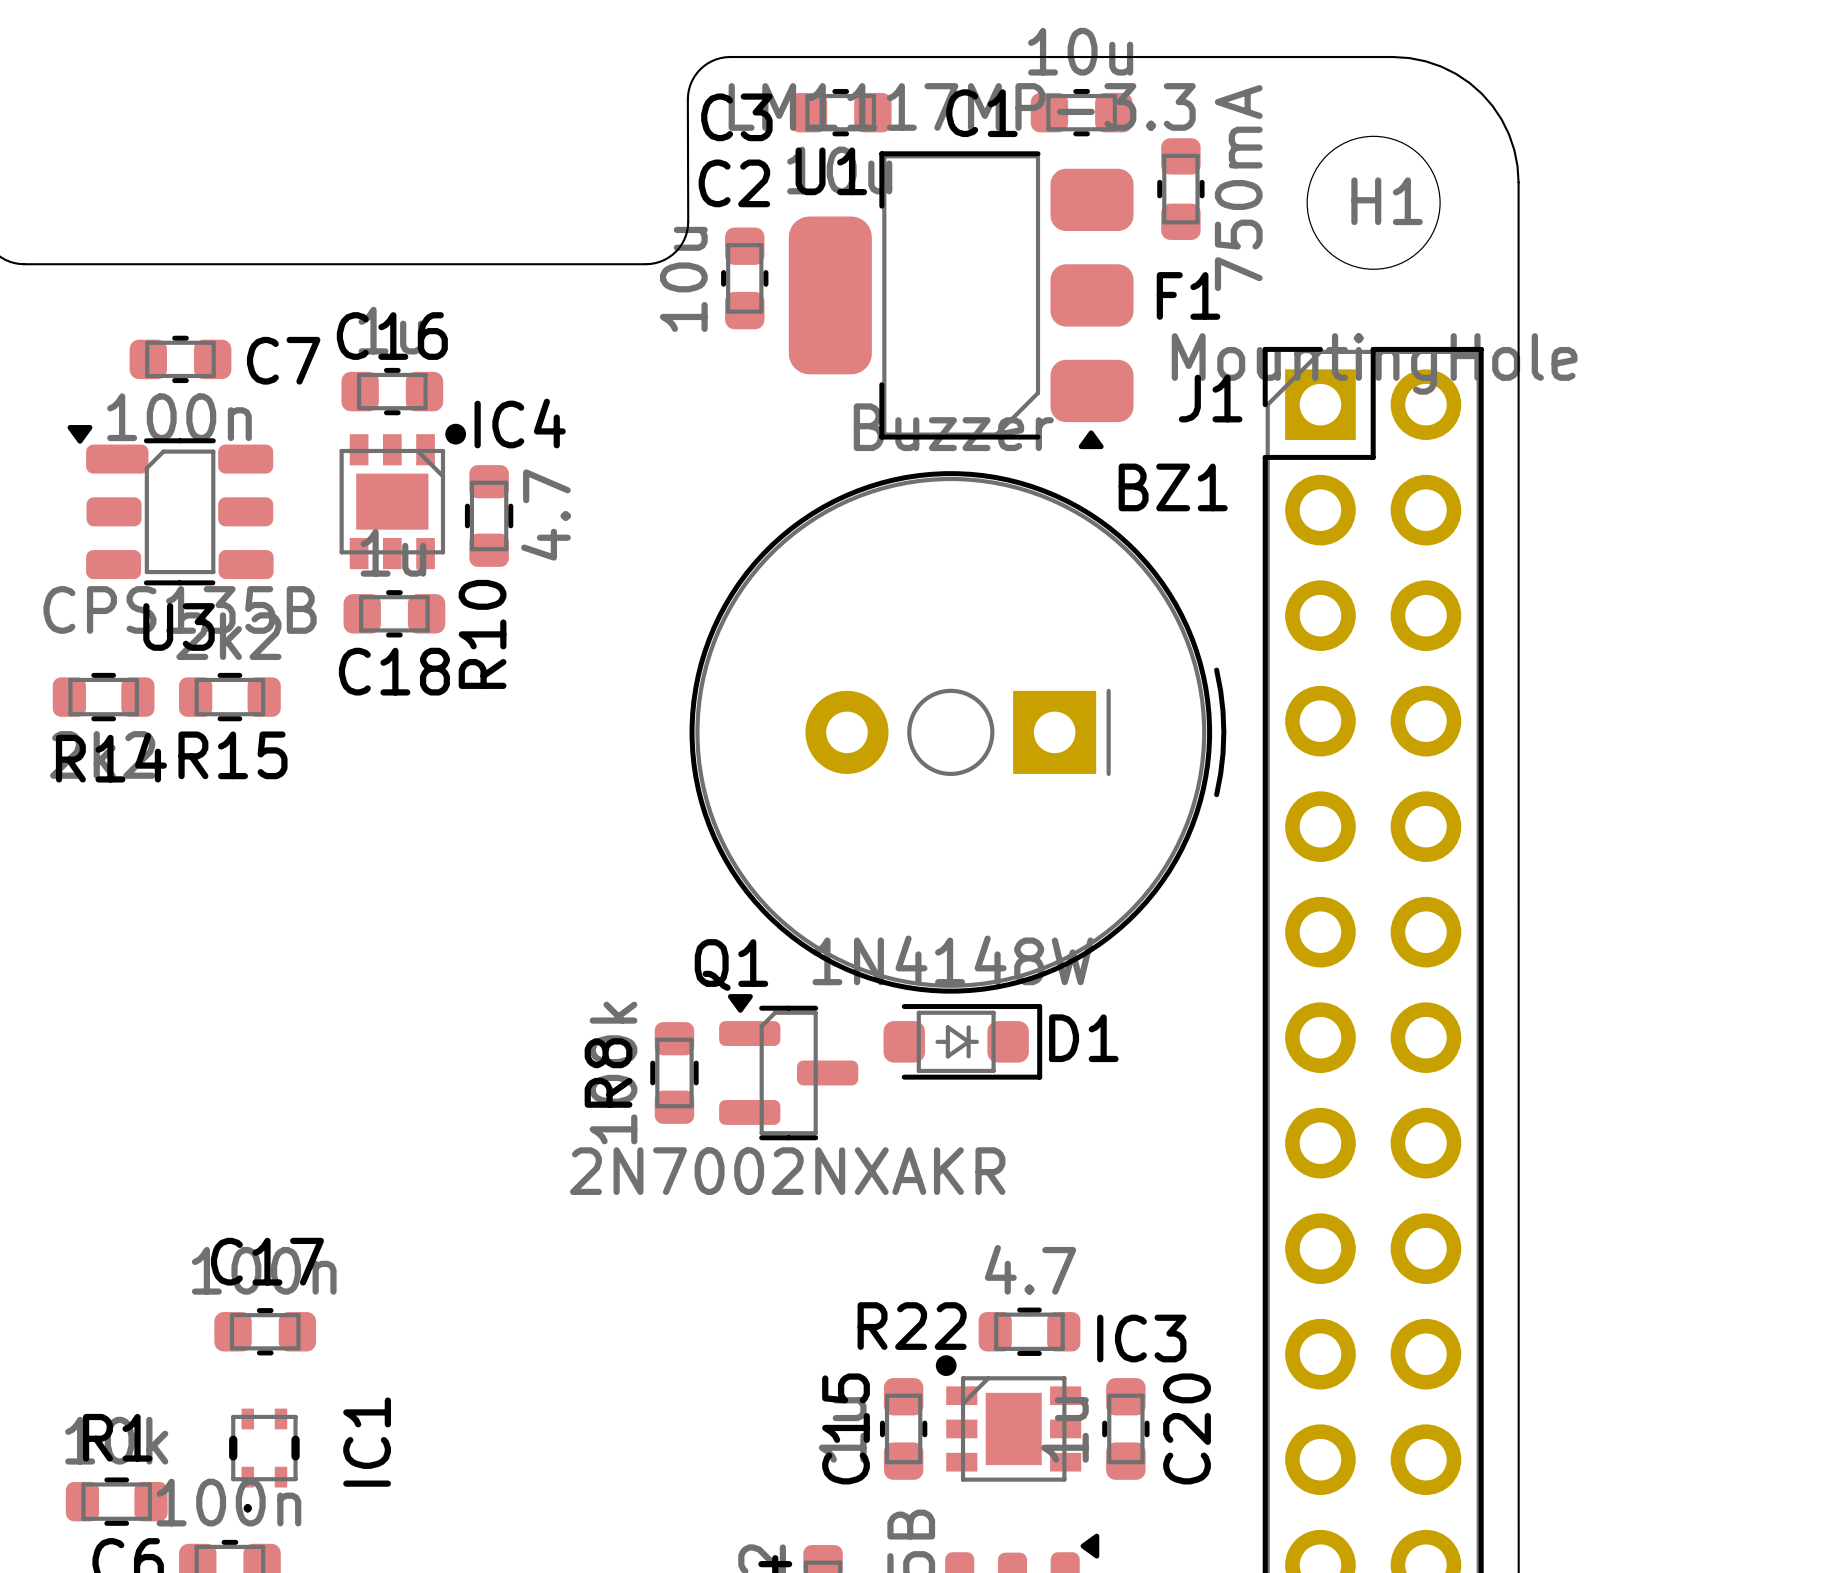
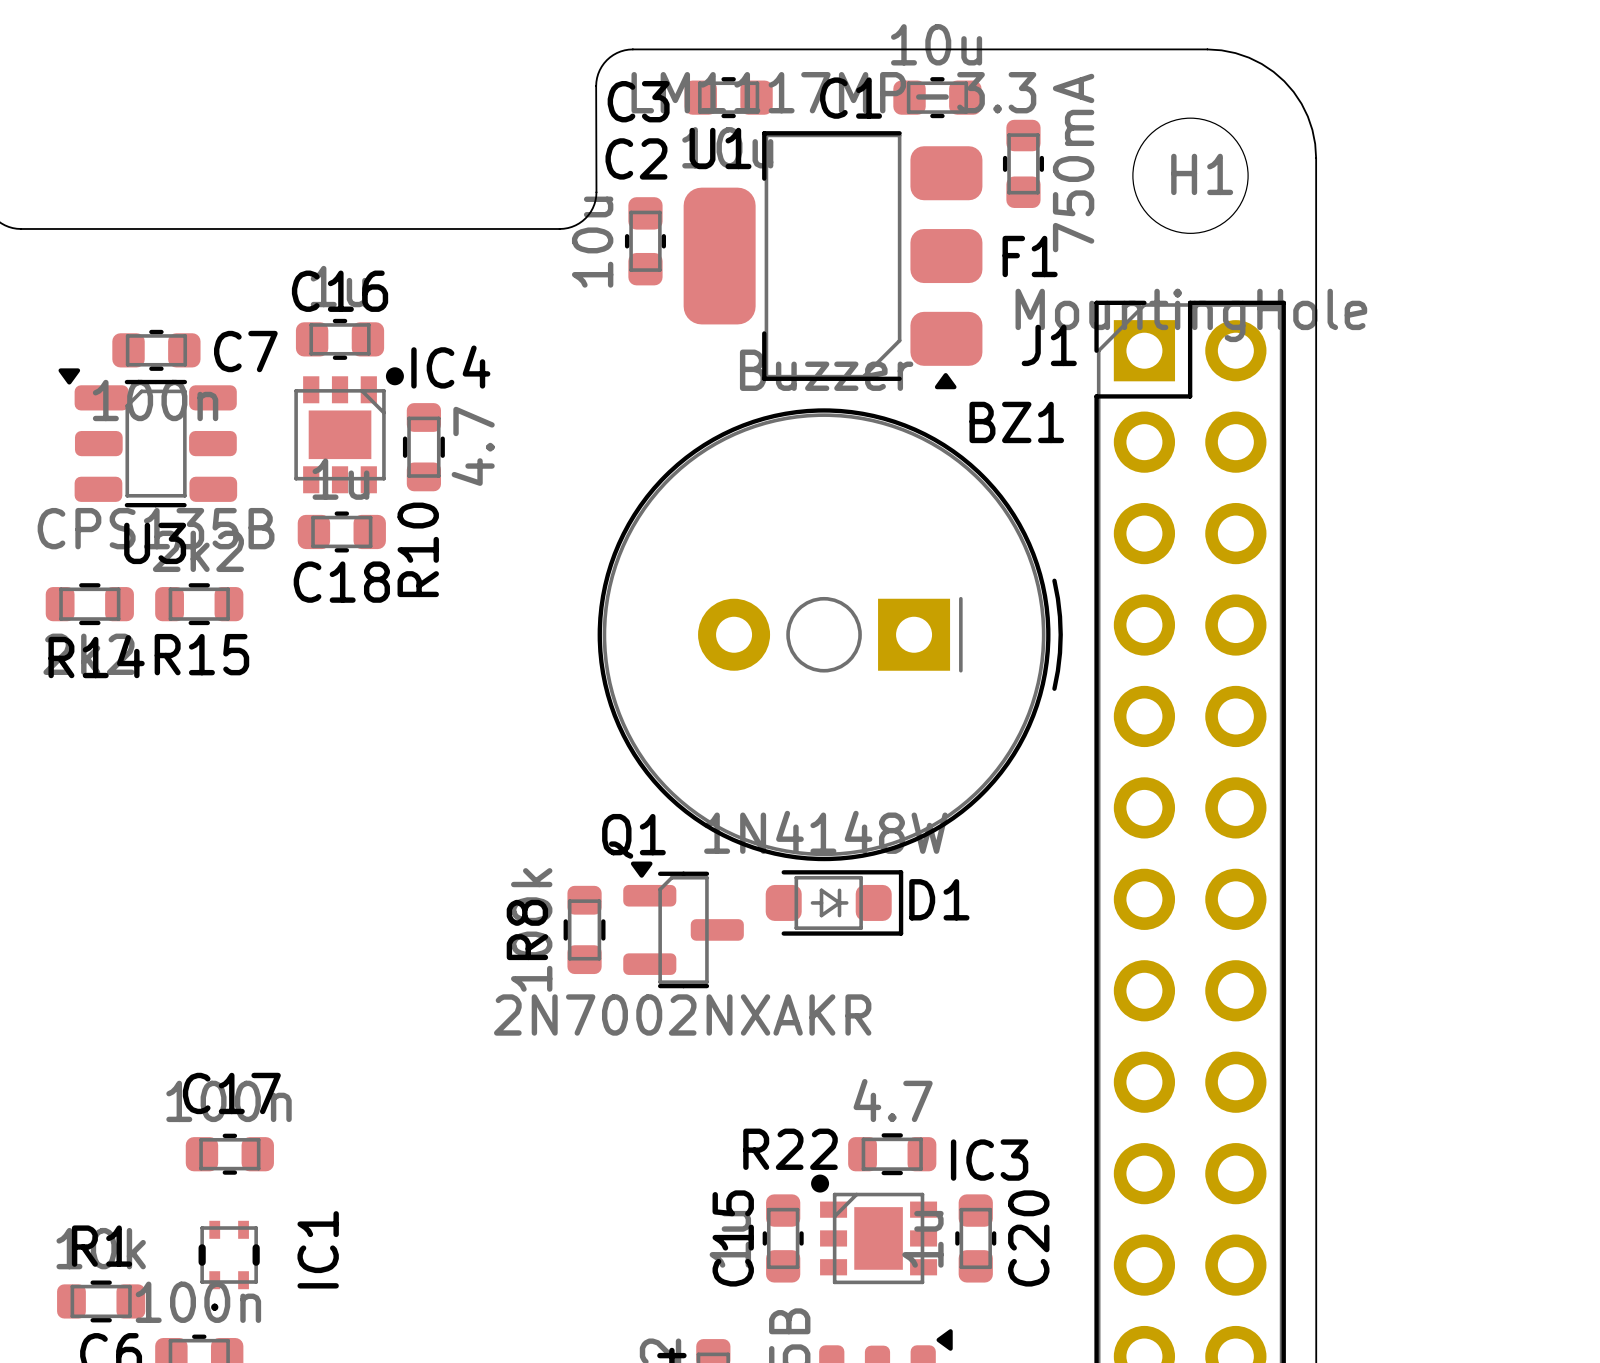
C7 position: (180, 359) -> (156, 350)

